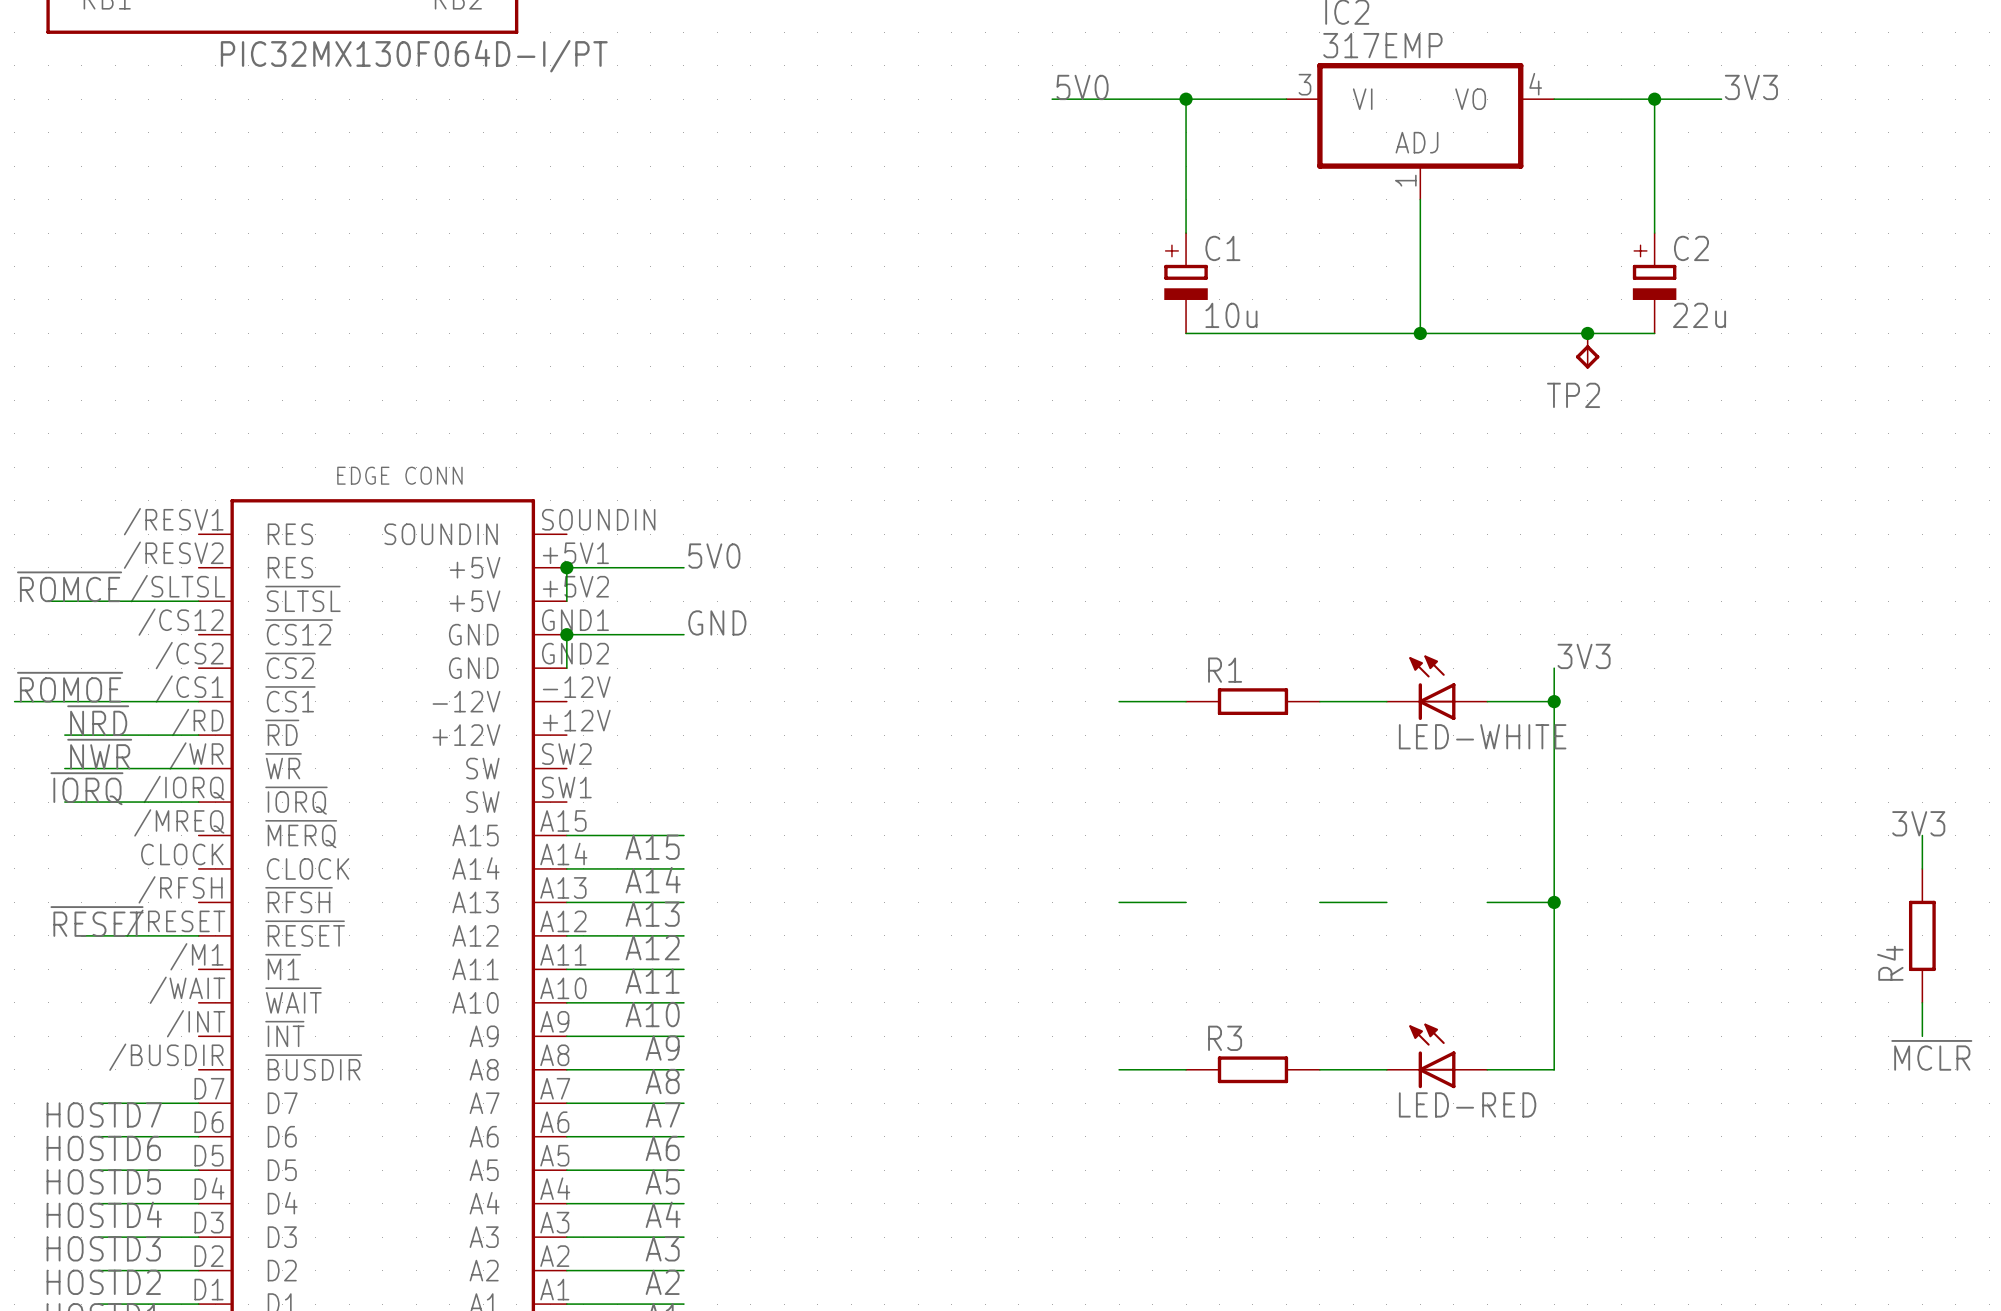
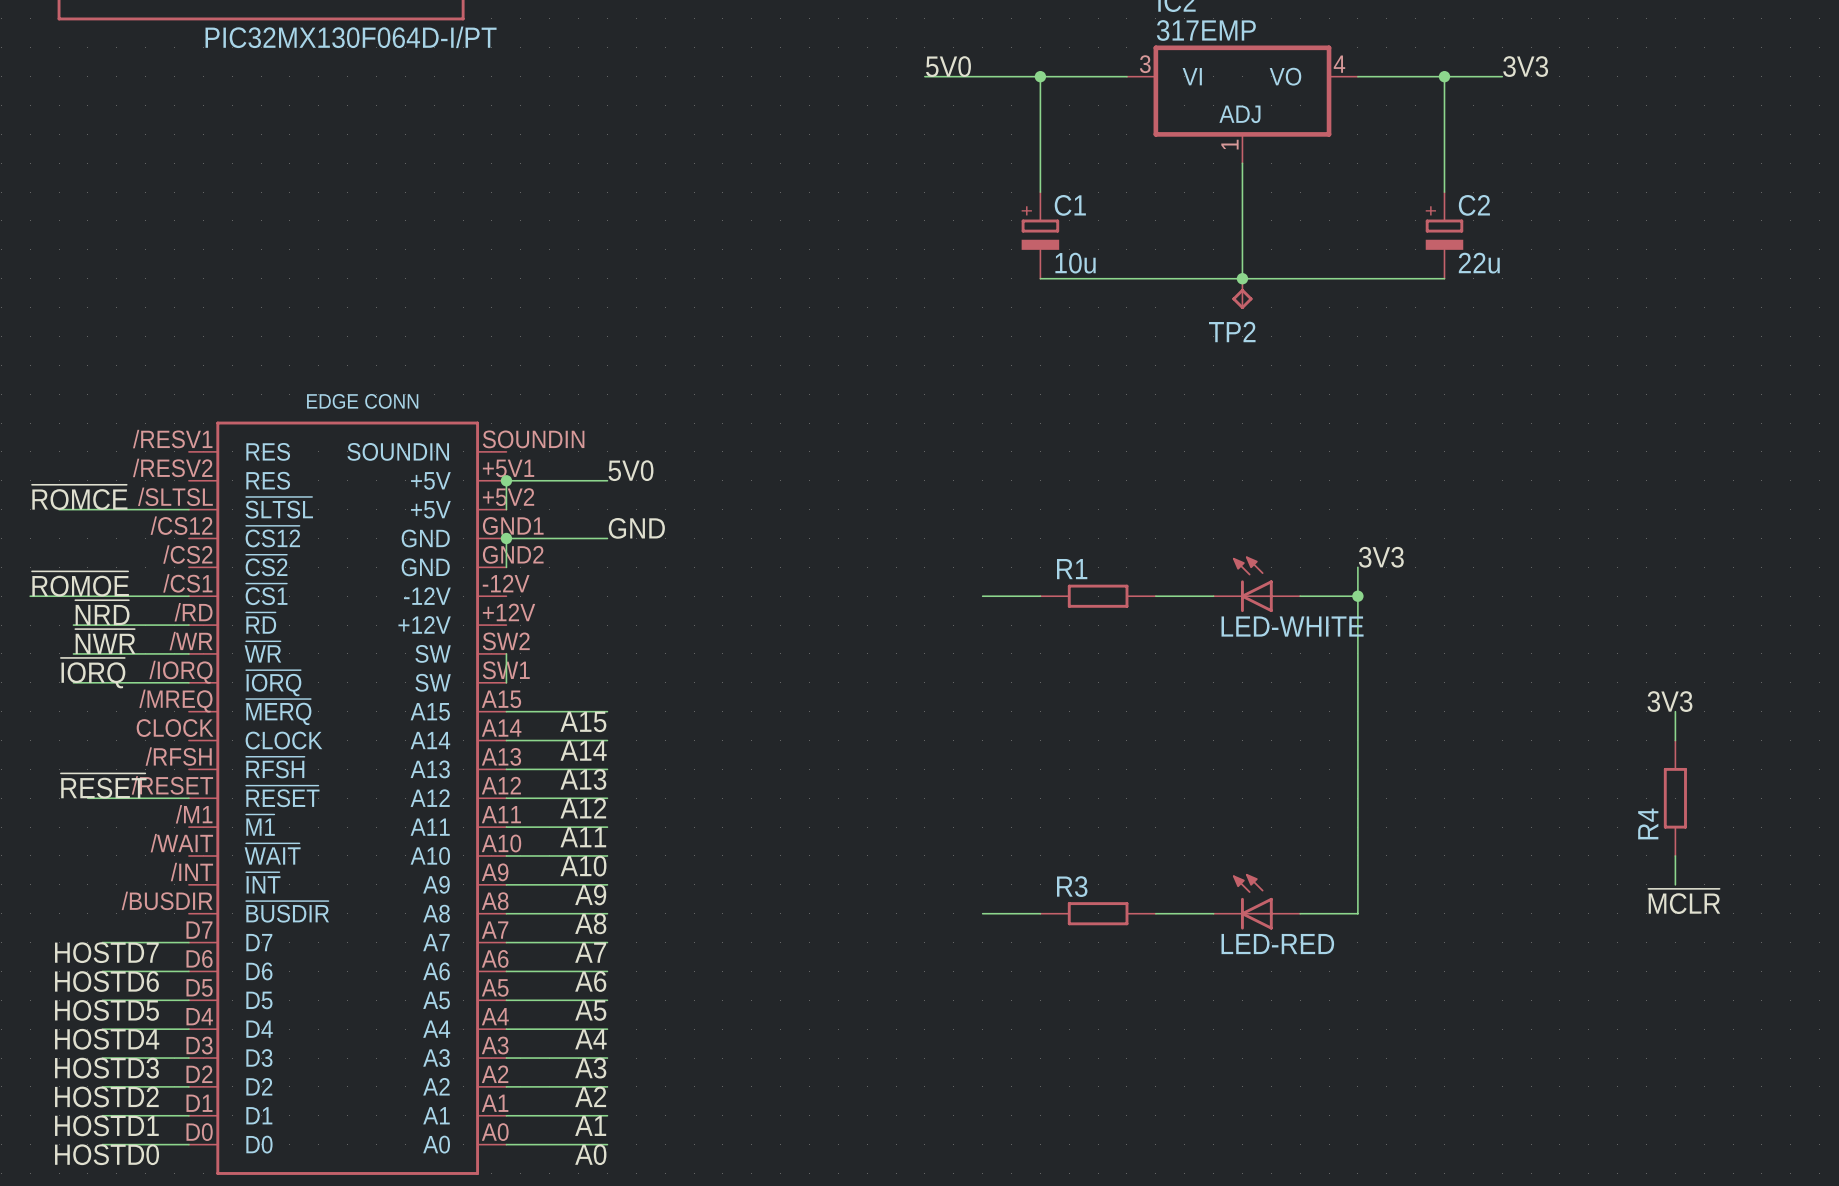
junction: (1587, 333) -> none
TP2 position: (1587, 351) -> (1242, 293)
wire: none -> (506, 653) (506, 682)
wire: (1119, 902) (1186, 902) -> none
wire: (1319, 902) (1386, 902) -> none
wire: (1487, 902) (1554, 902) -> none
junction: (1554, 902) -> none

